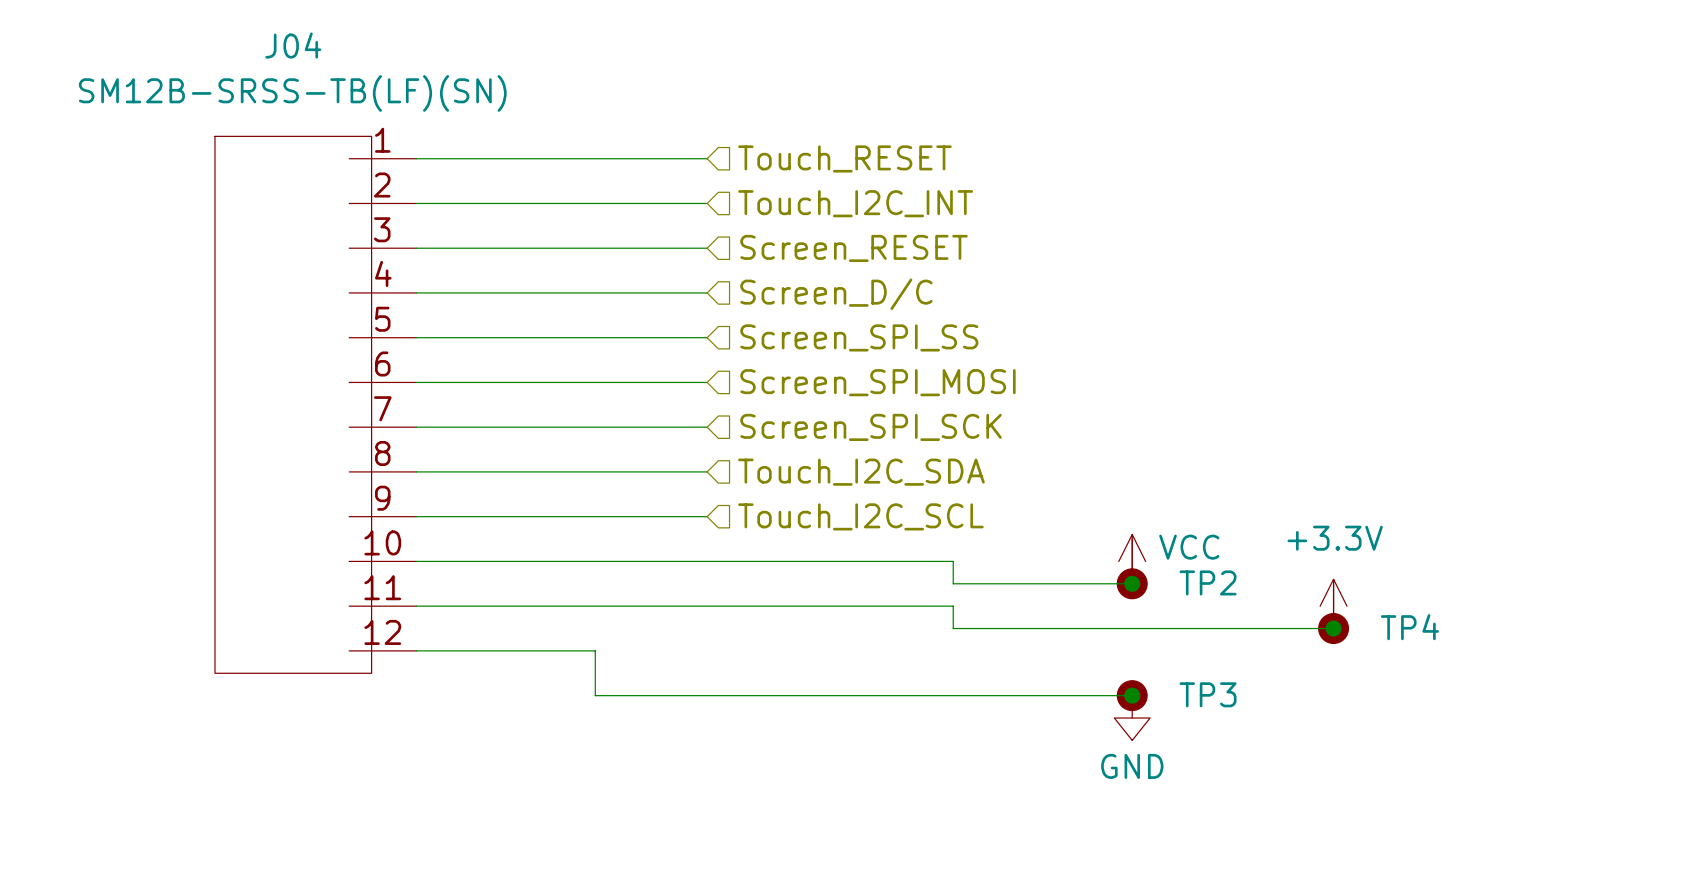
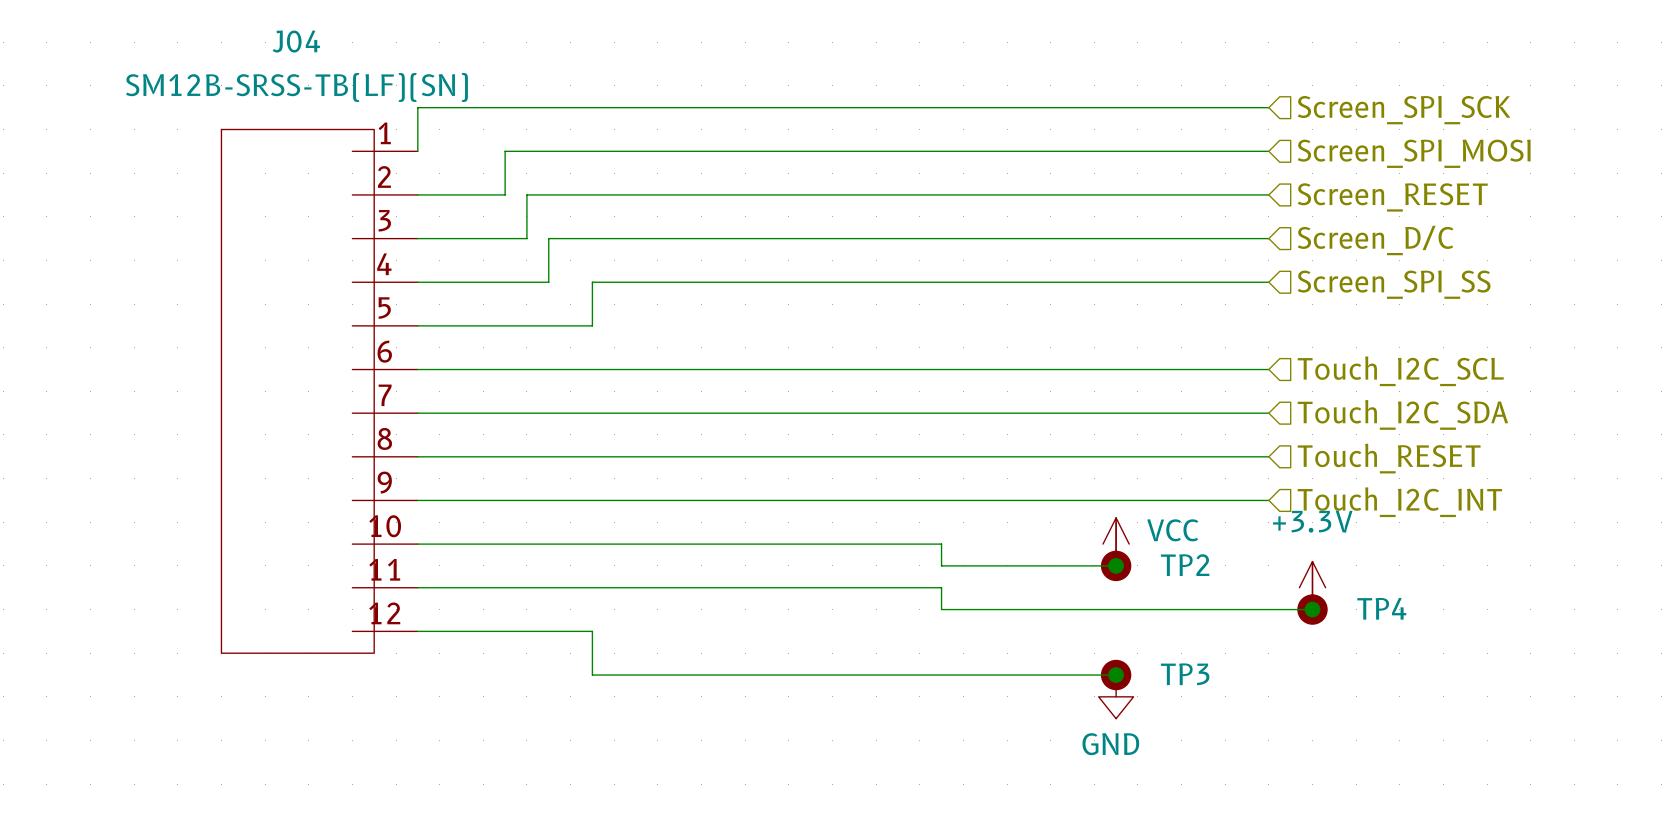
wire: none -> (1268, 107) (417, 107) (417, 151)
hierarchical label: none -> Screen_SPI_SCK (1404, 110)
wire: (416, 158) (505, 158) -> (505, 194) (505, 151)
wire: none -> (701, 151) (1268, 151)
hierarchical label: Touch_RESET (844, 158) -> none
hierarchical label: none -> Screen_SPI_MOSI (1414, 153)
wire: (505, 203) (528, 203) -> (526, 238) (526, 194)
wire: none -> (701, 194) (1268, 194)
hierarchical label: Touch_I2C_INT (855, 203) -> none
hierarchical label: none -> Screen_RESET (1392, 197)
wire: (528, 248) (550, 248) -> (548, 282) (548, 238)
wire: none -> (701, 238) (1268, 238)
hierarchical label: Screen_RESET (853, 248) -> none
hierarchical label: none -> Screen_D/C (1375, 240)
wire: (550, 292) (595, 292) -> (592, 325) (592, 282)
wire: none -> (701, 282) (1268, 282)
hierarchical label: none -> Screen_SPI_SS (1394, 284)
hierarchical label: Screen_D/C (836, 294) -> none
wire: (595, 337) (707, 337) -> none
hierarchical label: Screen_SPI_SS (859, 337) -> none
wire: none -> (701, 369) (1268, 369)
hierarchical label: Screen_SPI_MOSI (877, 382) -> none
hierarchical label: none -> Touch_I2C_SCL (1400, 371)
wire: none -> (701, 413) (1268, 413)
hierarchical label: Screen_SPI_SCK (871, 427) -> none
hierarchical label: none -> Touch_I2C_SDA (1402, 414)
wire: none -> (701, 456) (1268, 456)
hierarchical label: Touch_I2C_SDA (861, 472) -> none
hierarchical label: none -> Touch_RESET (1389, 458)
wire: none -> (701, 500) (1268, 500)
hierarchical label: Touch_I2C_SCL (860, 516) -> none
hierarchical label: none -> Touch_I2C_INT (1399, 502)

